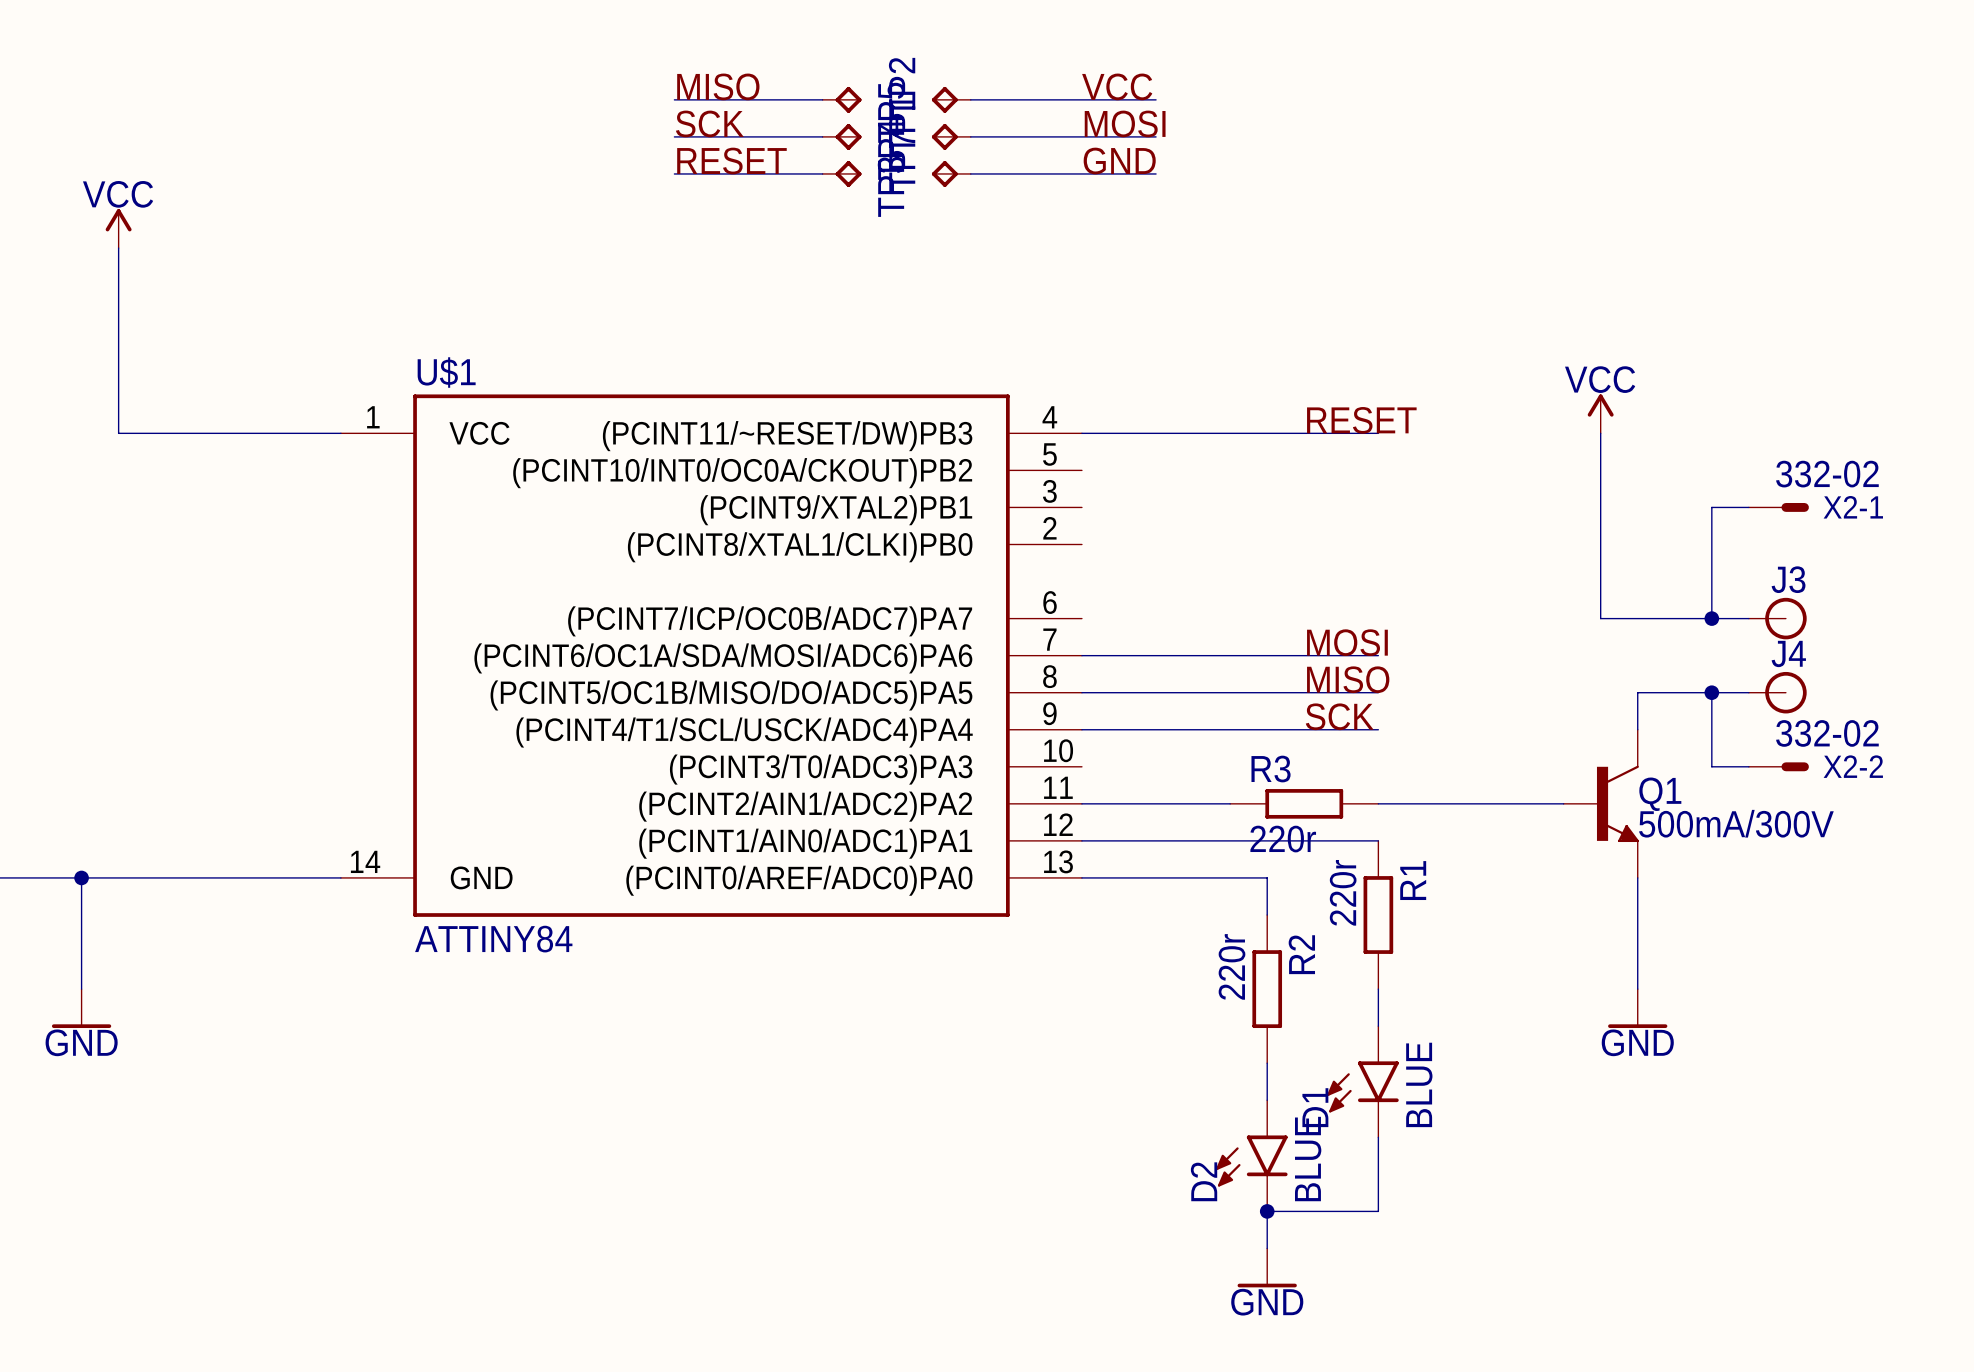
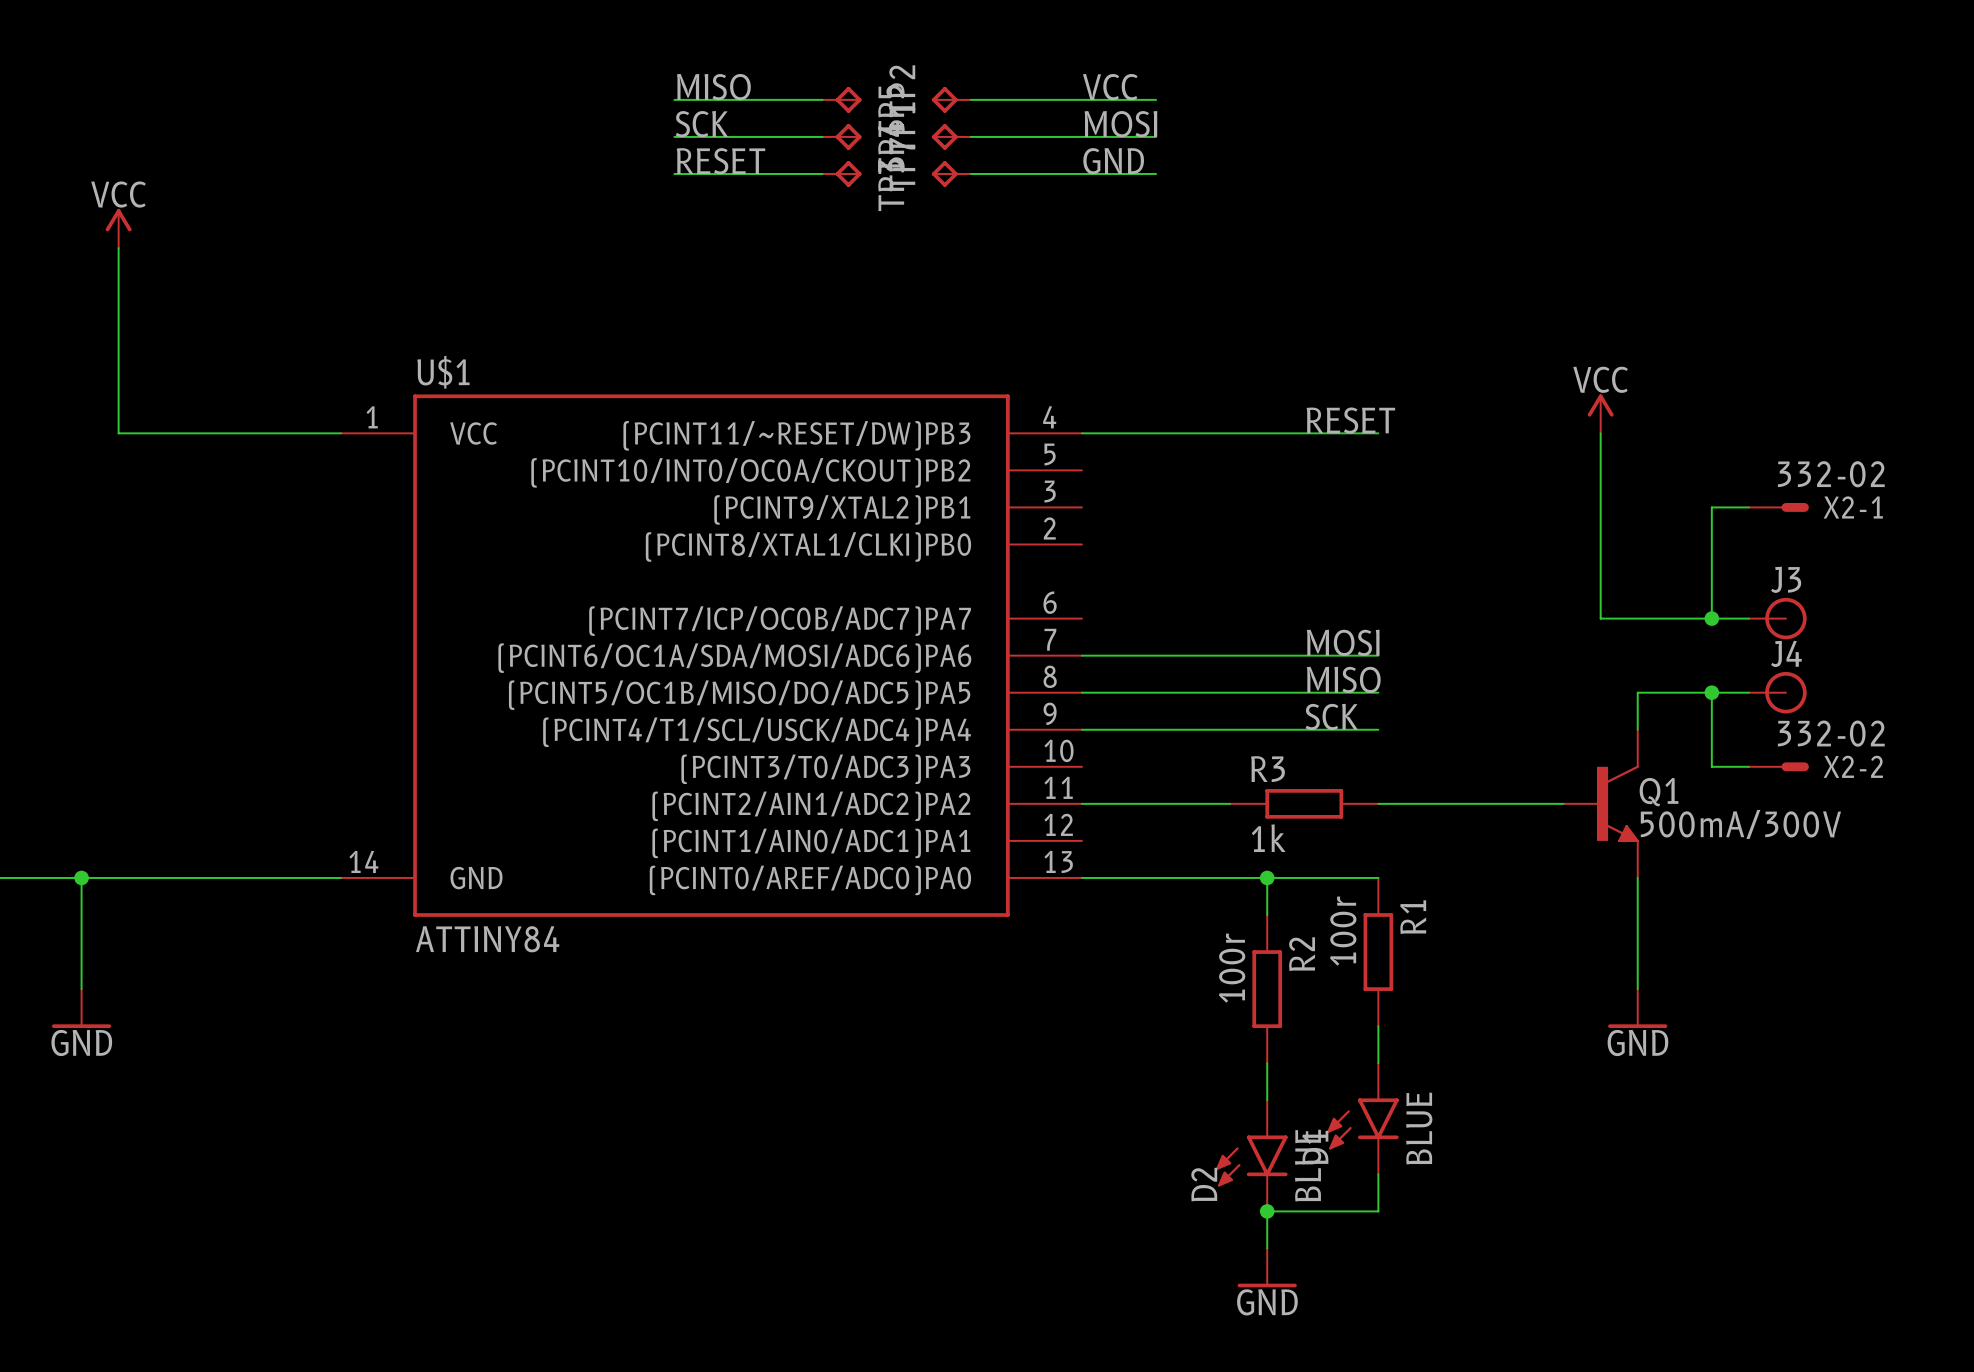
R3 value: 220r (1283, 839) -> 1k (1268, 838)
wire: (1081, 840) (1378, 840) -> none
wire: none -> (1267, 877) (1378, 877)
junction: none -> (1267, 877)
R1 value: 220r (1343, 892) -> 100r (1343, 931)
R1 position: (1378, 915) -> (1378, 952)
R2 value: 220r (1232, 966) -> 100r (1232, 968)
D1 position: (1362, 1081) -> (1362, 1118)

